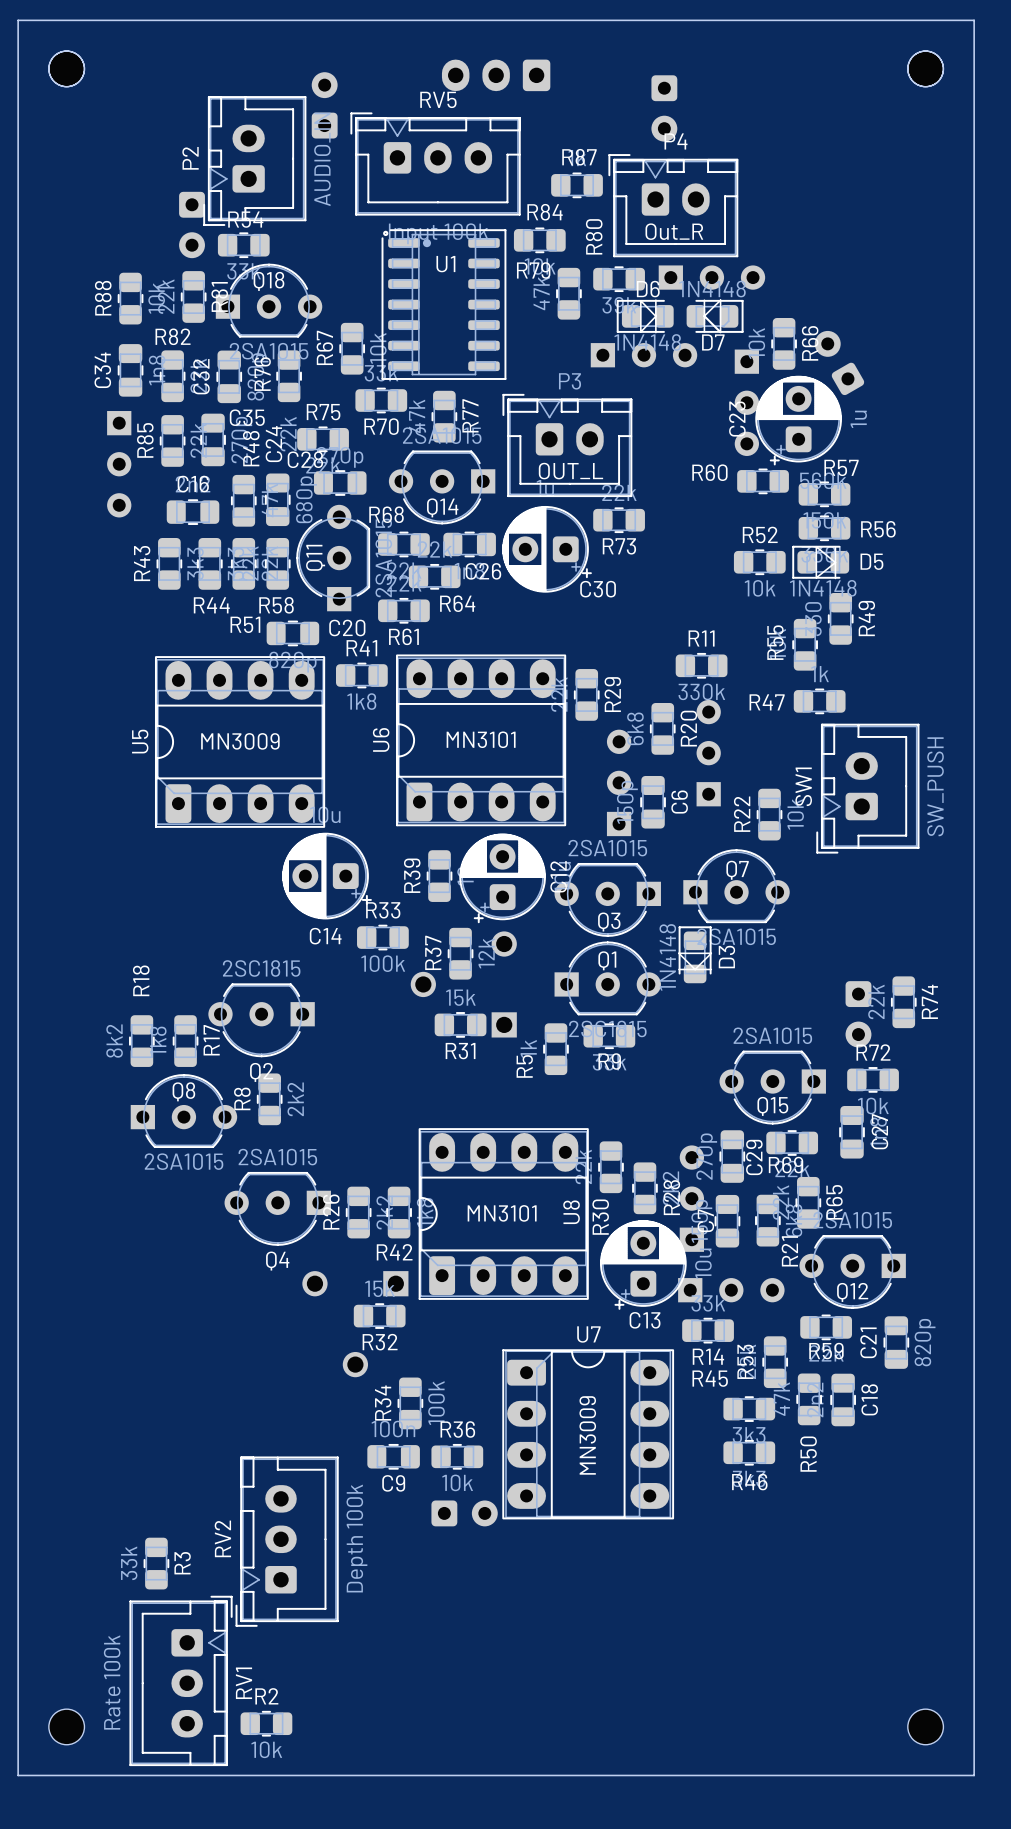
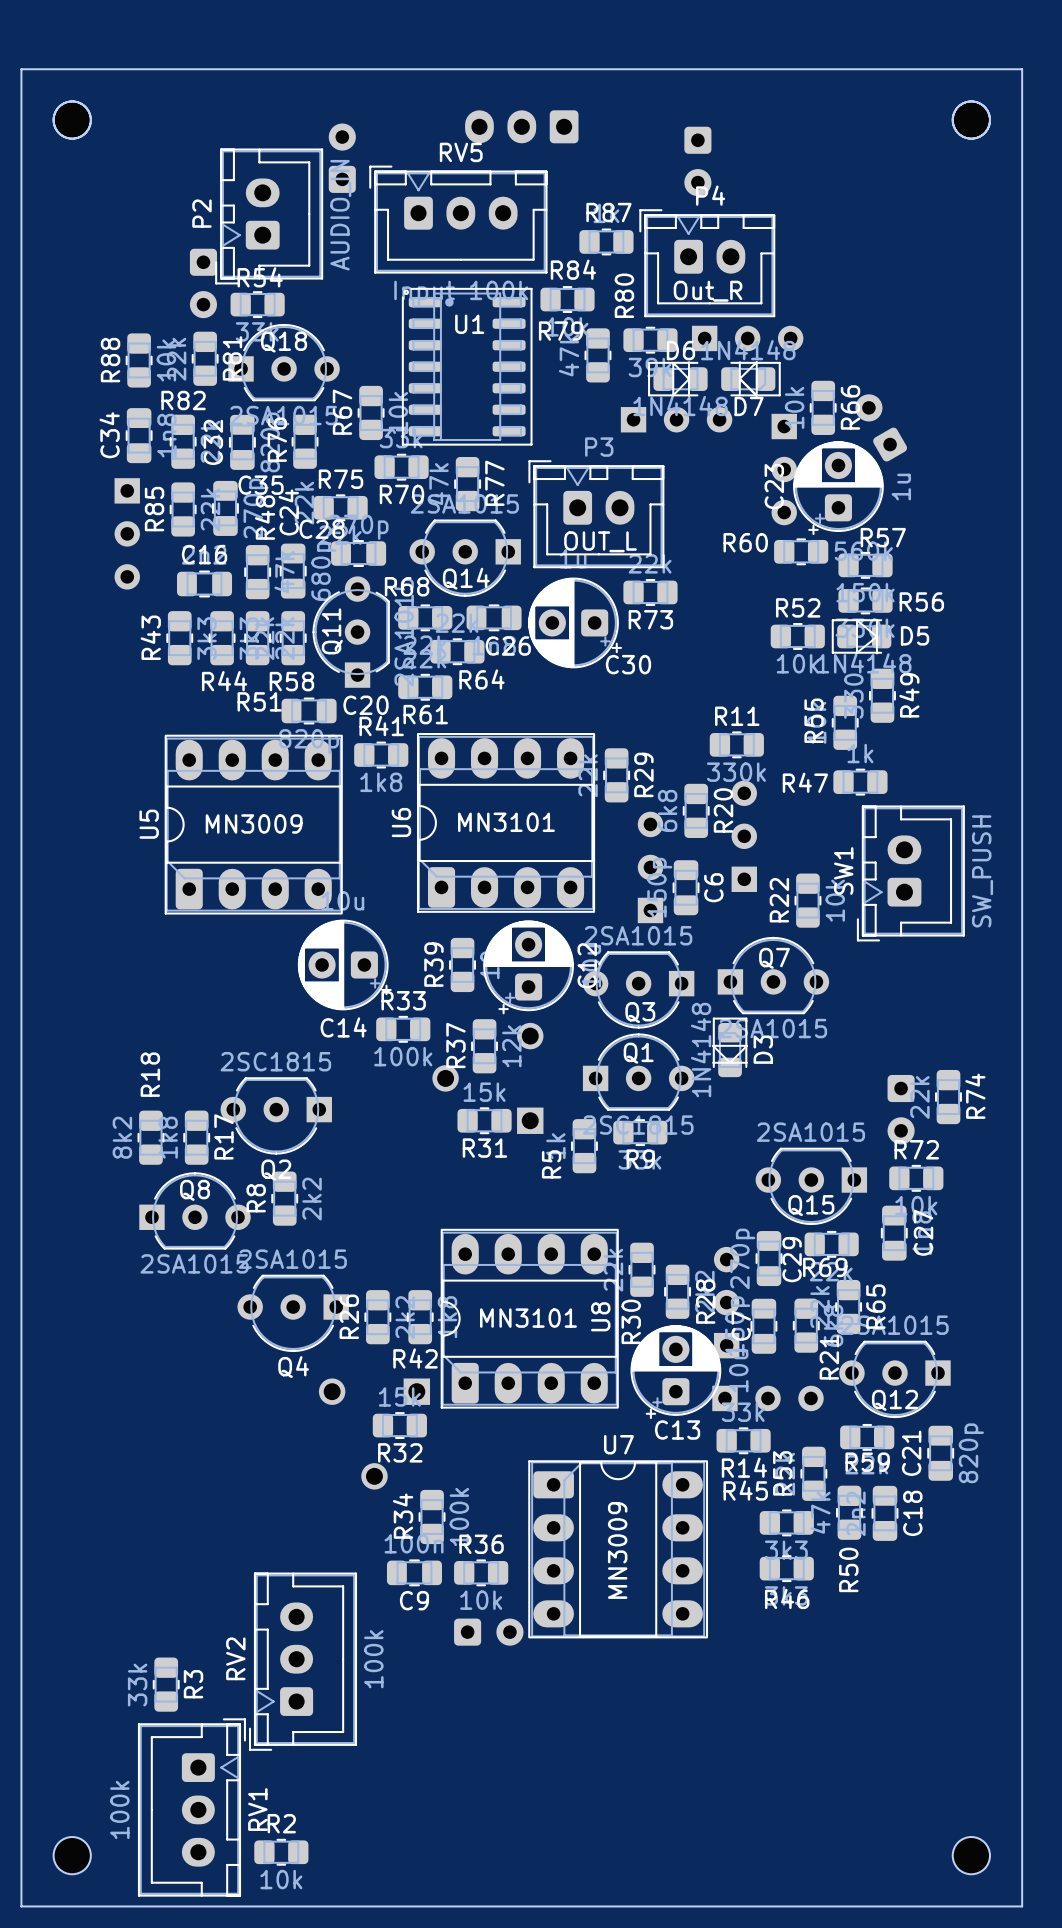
RV2 value: Depth 100k (356, 1538) -> 100k (373, 1659)
RV1 value: Rate 100k (112, 1682) -> 100k (119, 1809)

